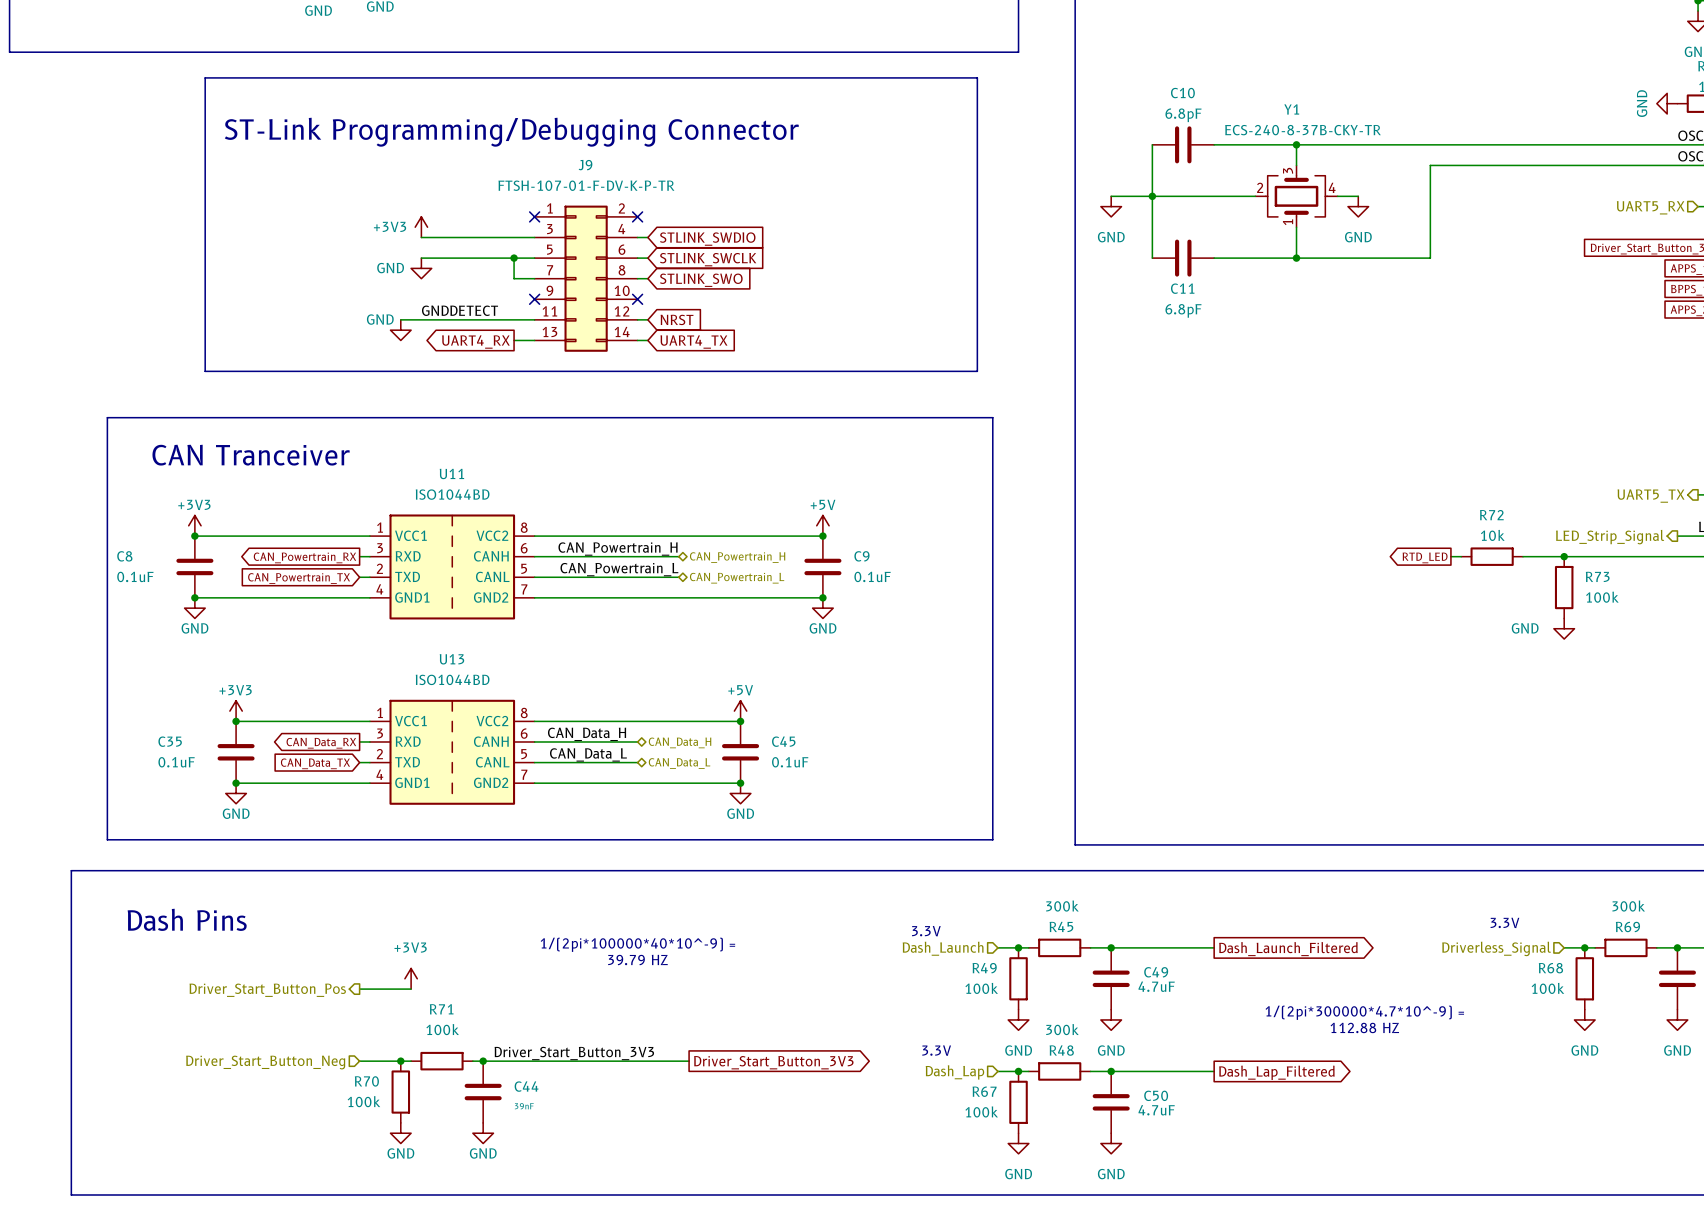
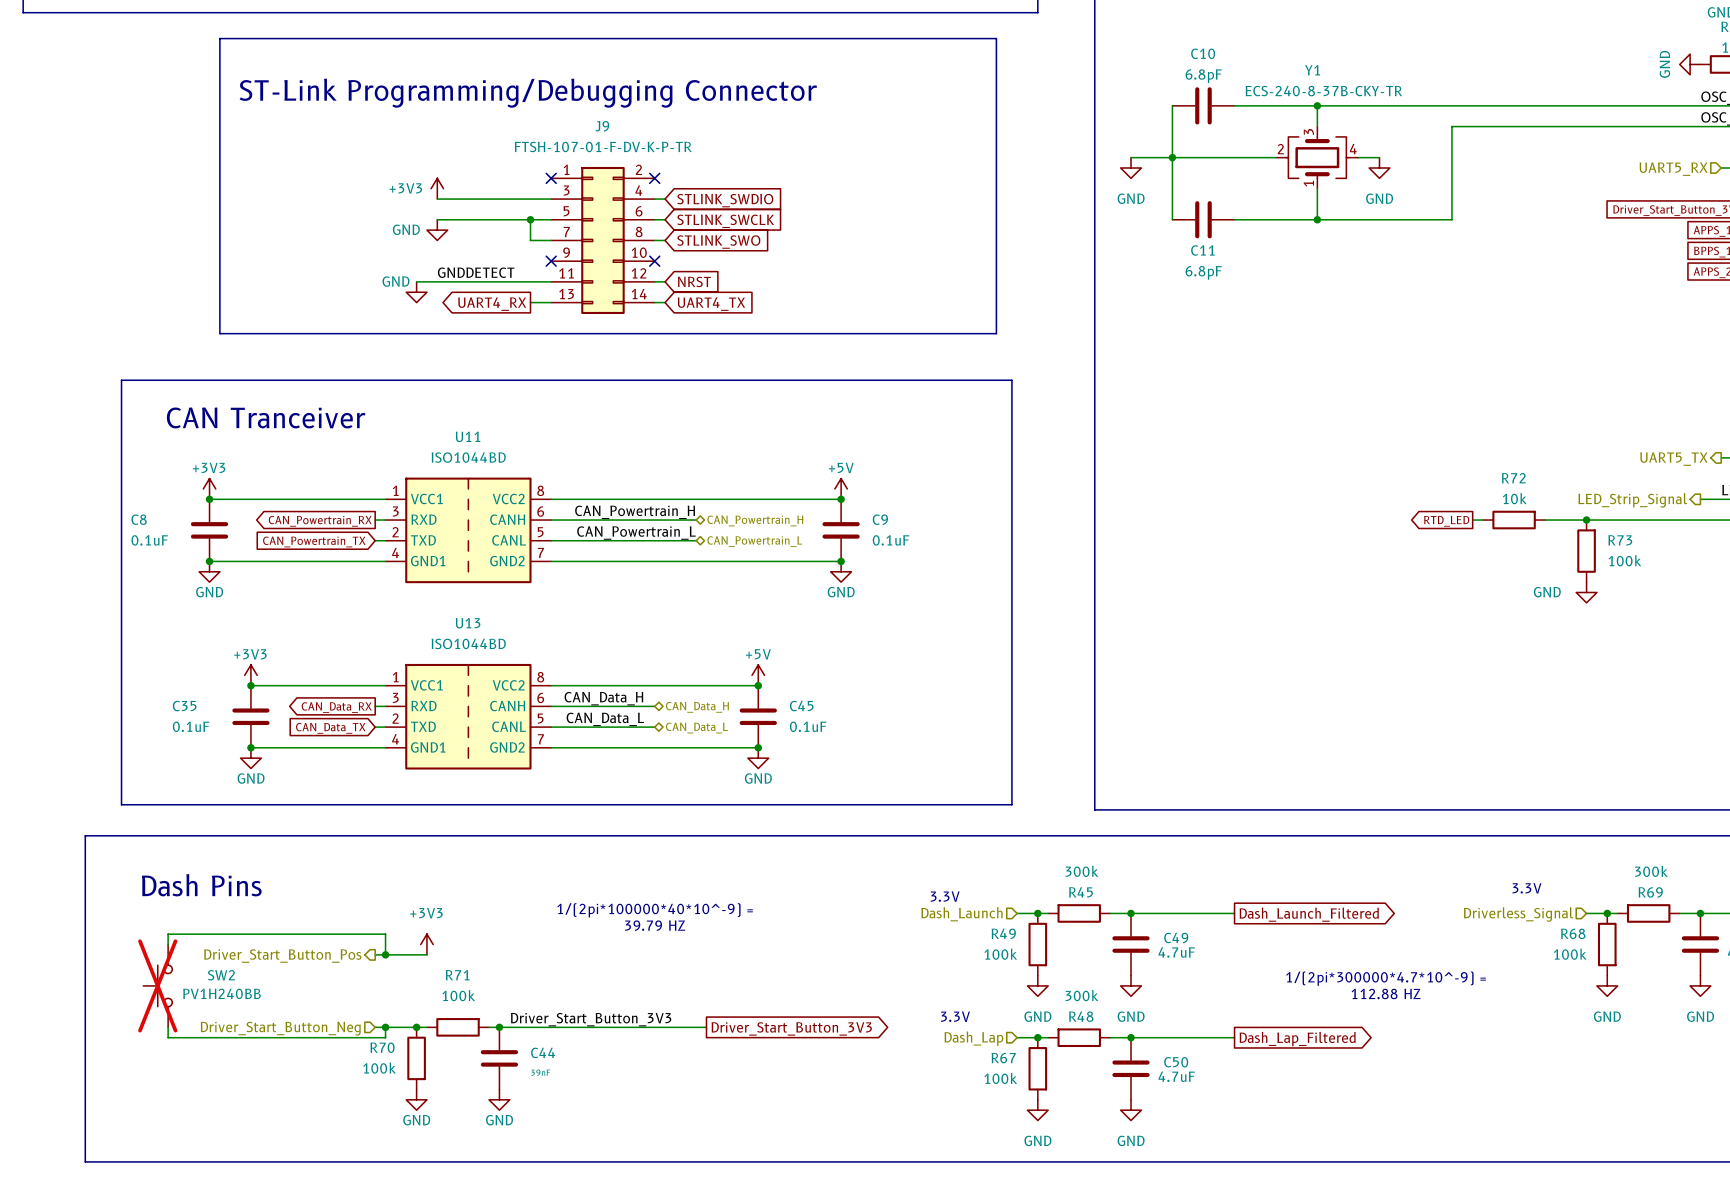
wire: none -> (168, 944) (168, 934) (385, 934) (385, 954)
junction: none -> (385, 954)
SW2: none -> PV1H240BB (157, 985)
wire: none -> (168, 1027) (168, 1037) (385, 1037) (385, 1027)
junction: none -> (385, 1027)

